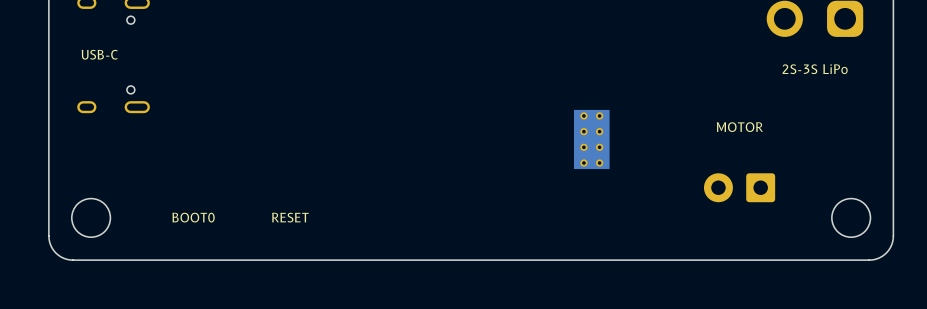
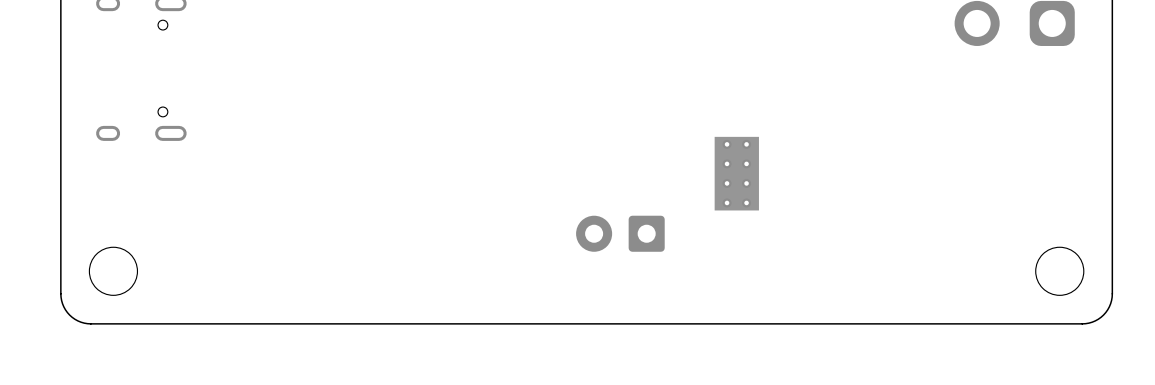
text: USB-C (99, 54) -> none
text: 2S-3S LiPo (815, 69) -> none
text: MOTOR (739, 127) -> none
part position: (739, 187) -> (620, 233)
text: BOOT0 (193, 217) -> none
text: RESET (290, 217) -> none

